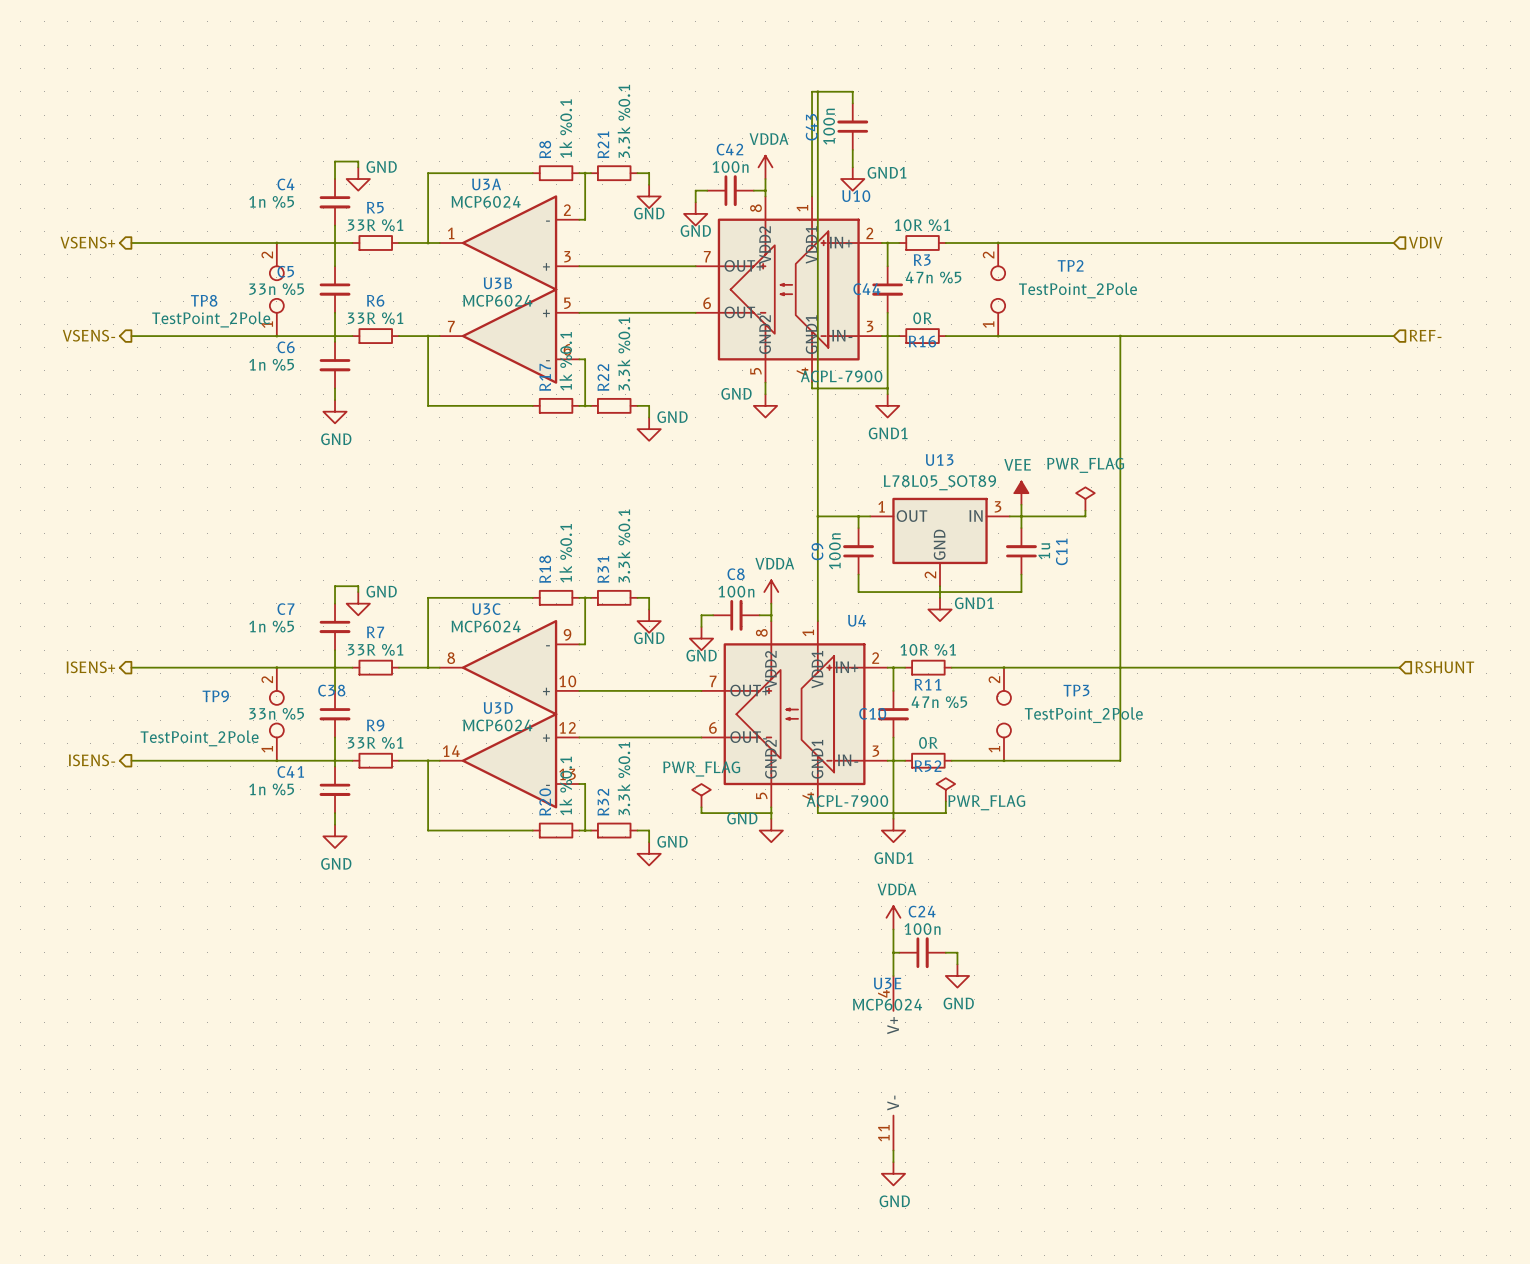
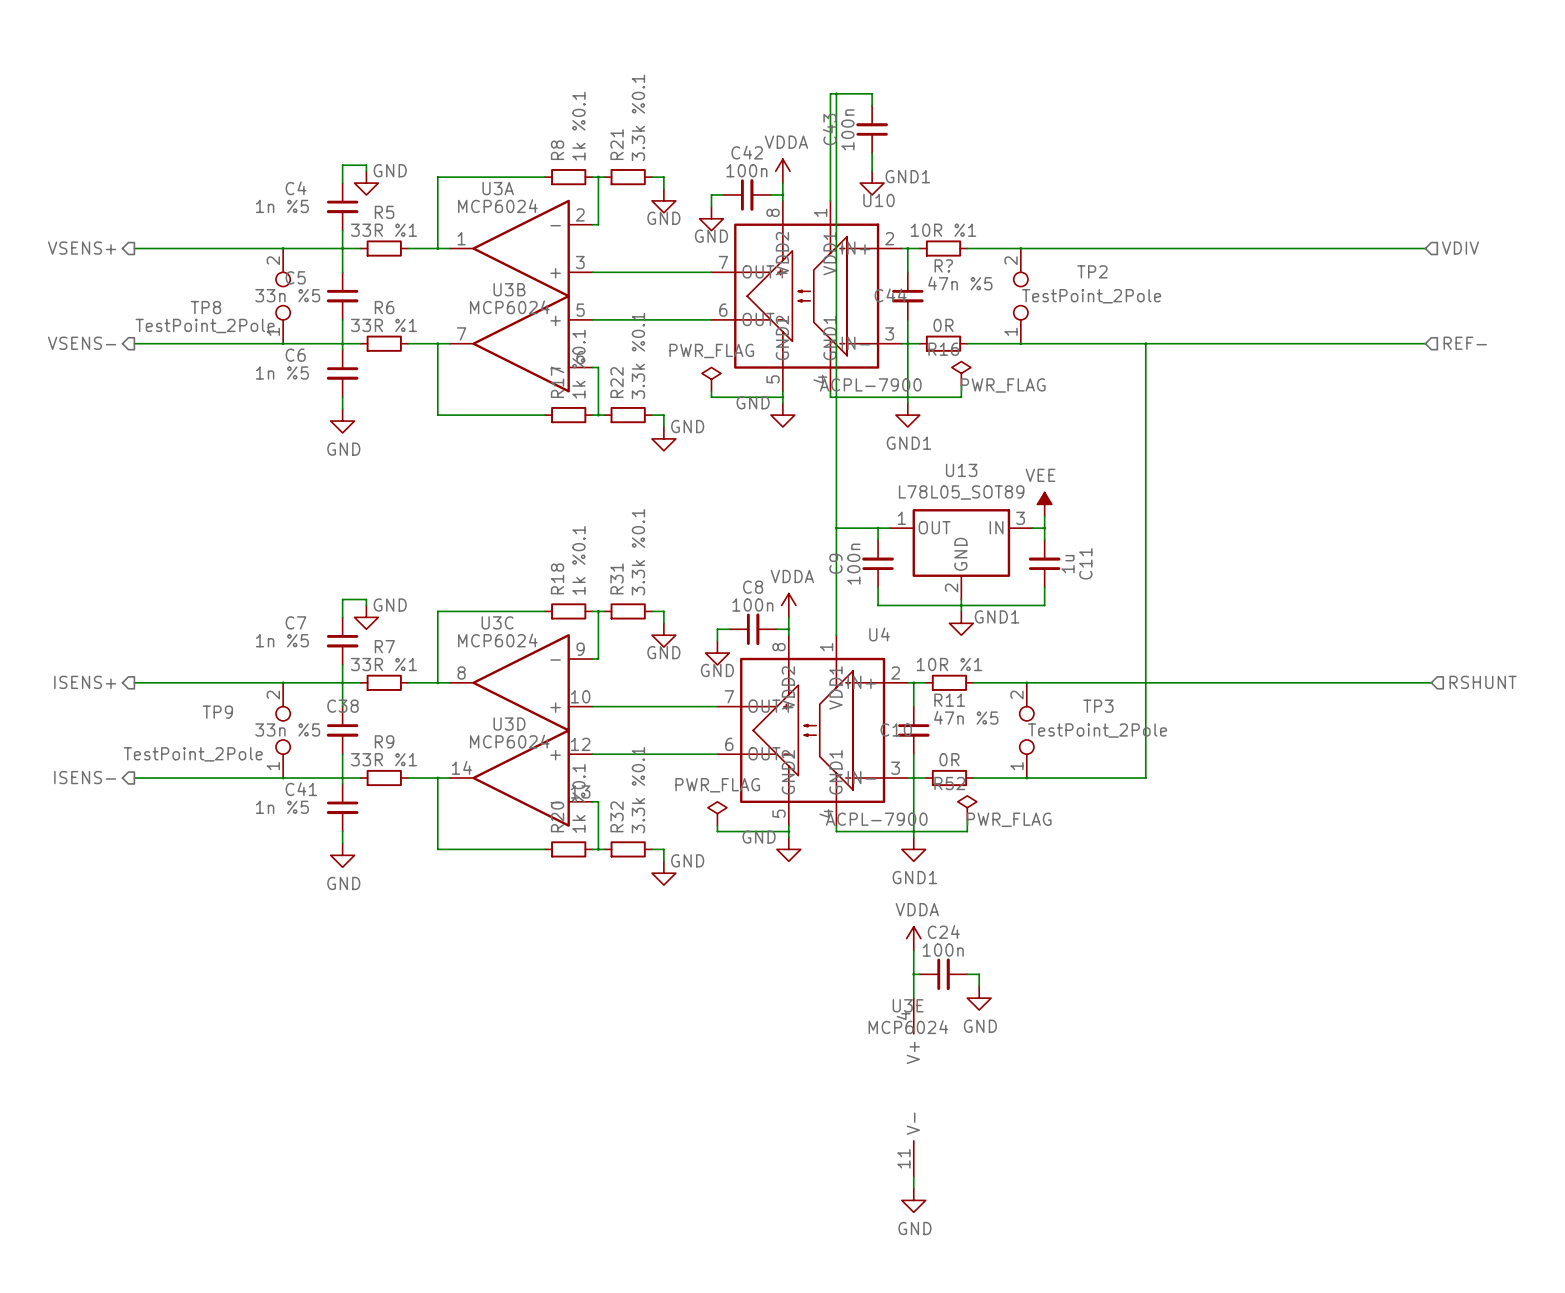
R3 name: R3 (922, 260) -> R? (943, 265)
power symbol: none -> PWR_FLAG (711, 379)
wire: none -> (961, 385) (961, 397) (907, 397)
wire: none -> (711, 391) (711, 397) (782, 397)
power symbol text position: PWR_FLAG (1085, 465) -> PWR_FLAG (1003, 385)
power symbol position: PWR_FLAG (1085, 498) -> PWR_FLAG (961, 373)
wire: (1085, 510) (1085, 516) (1021, 516) -> none

